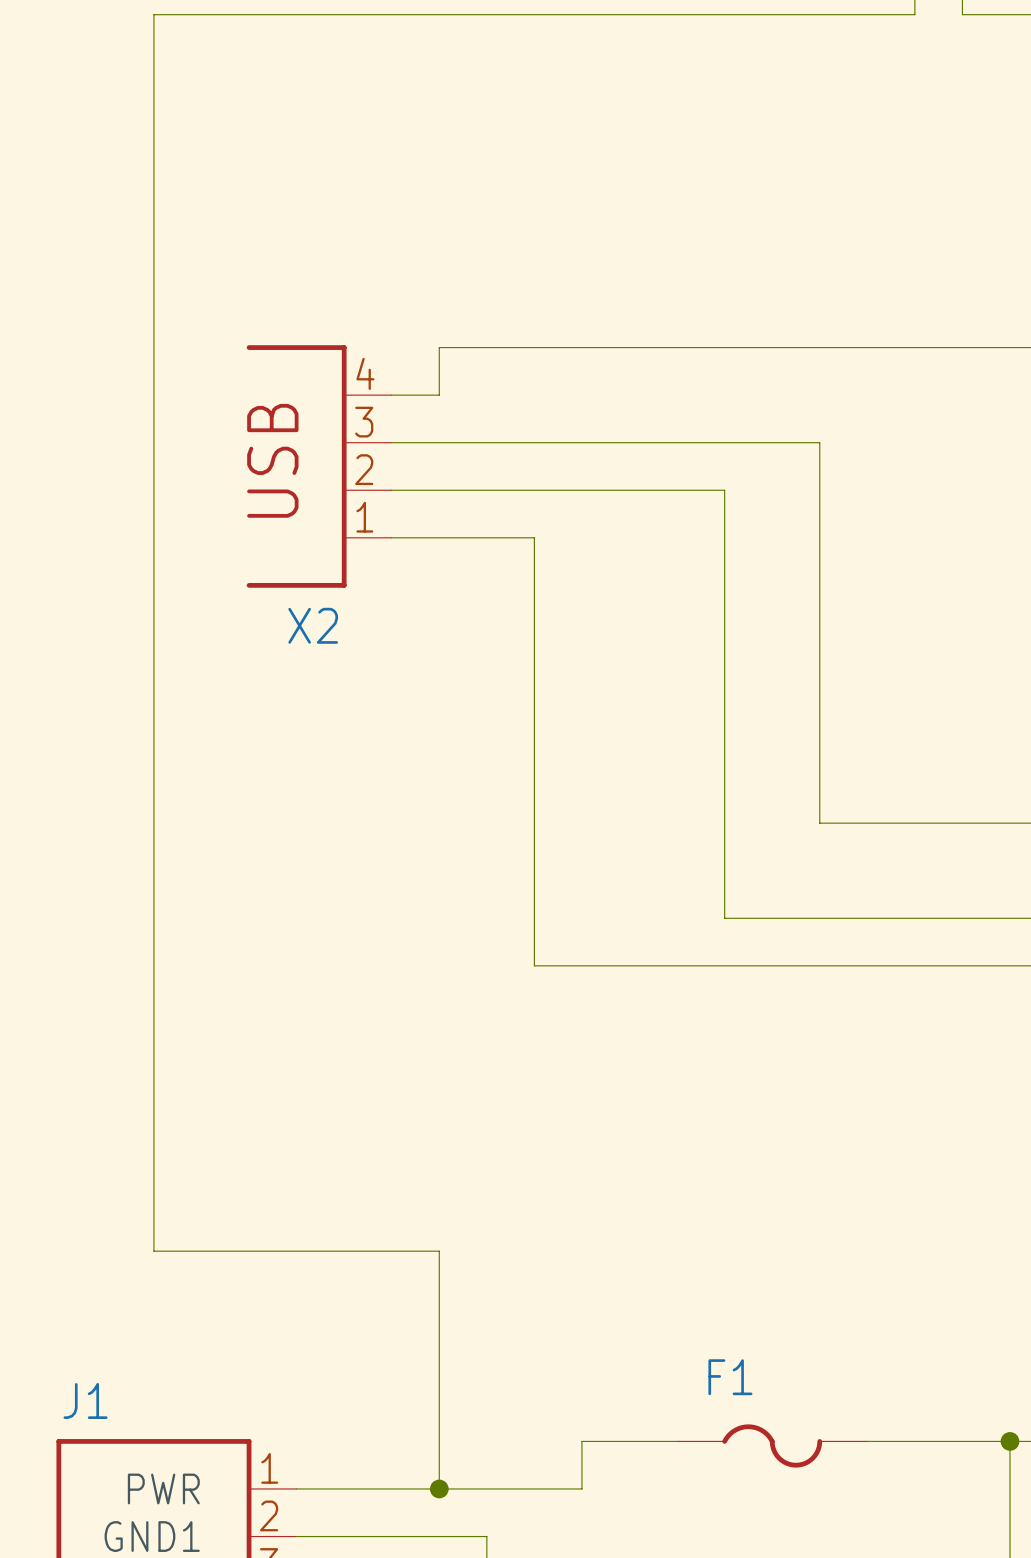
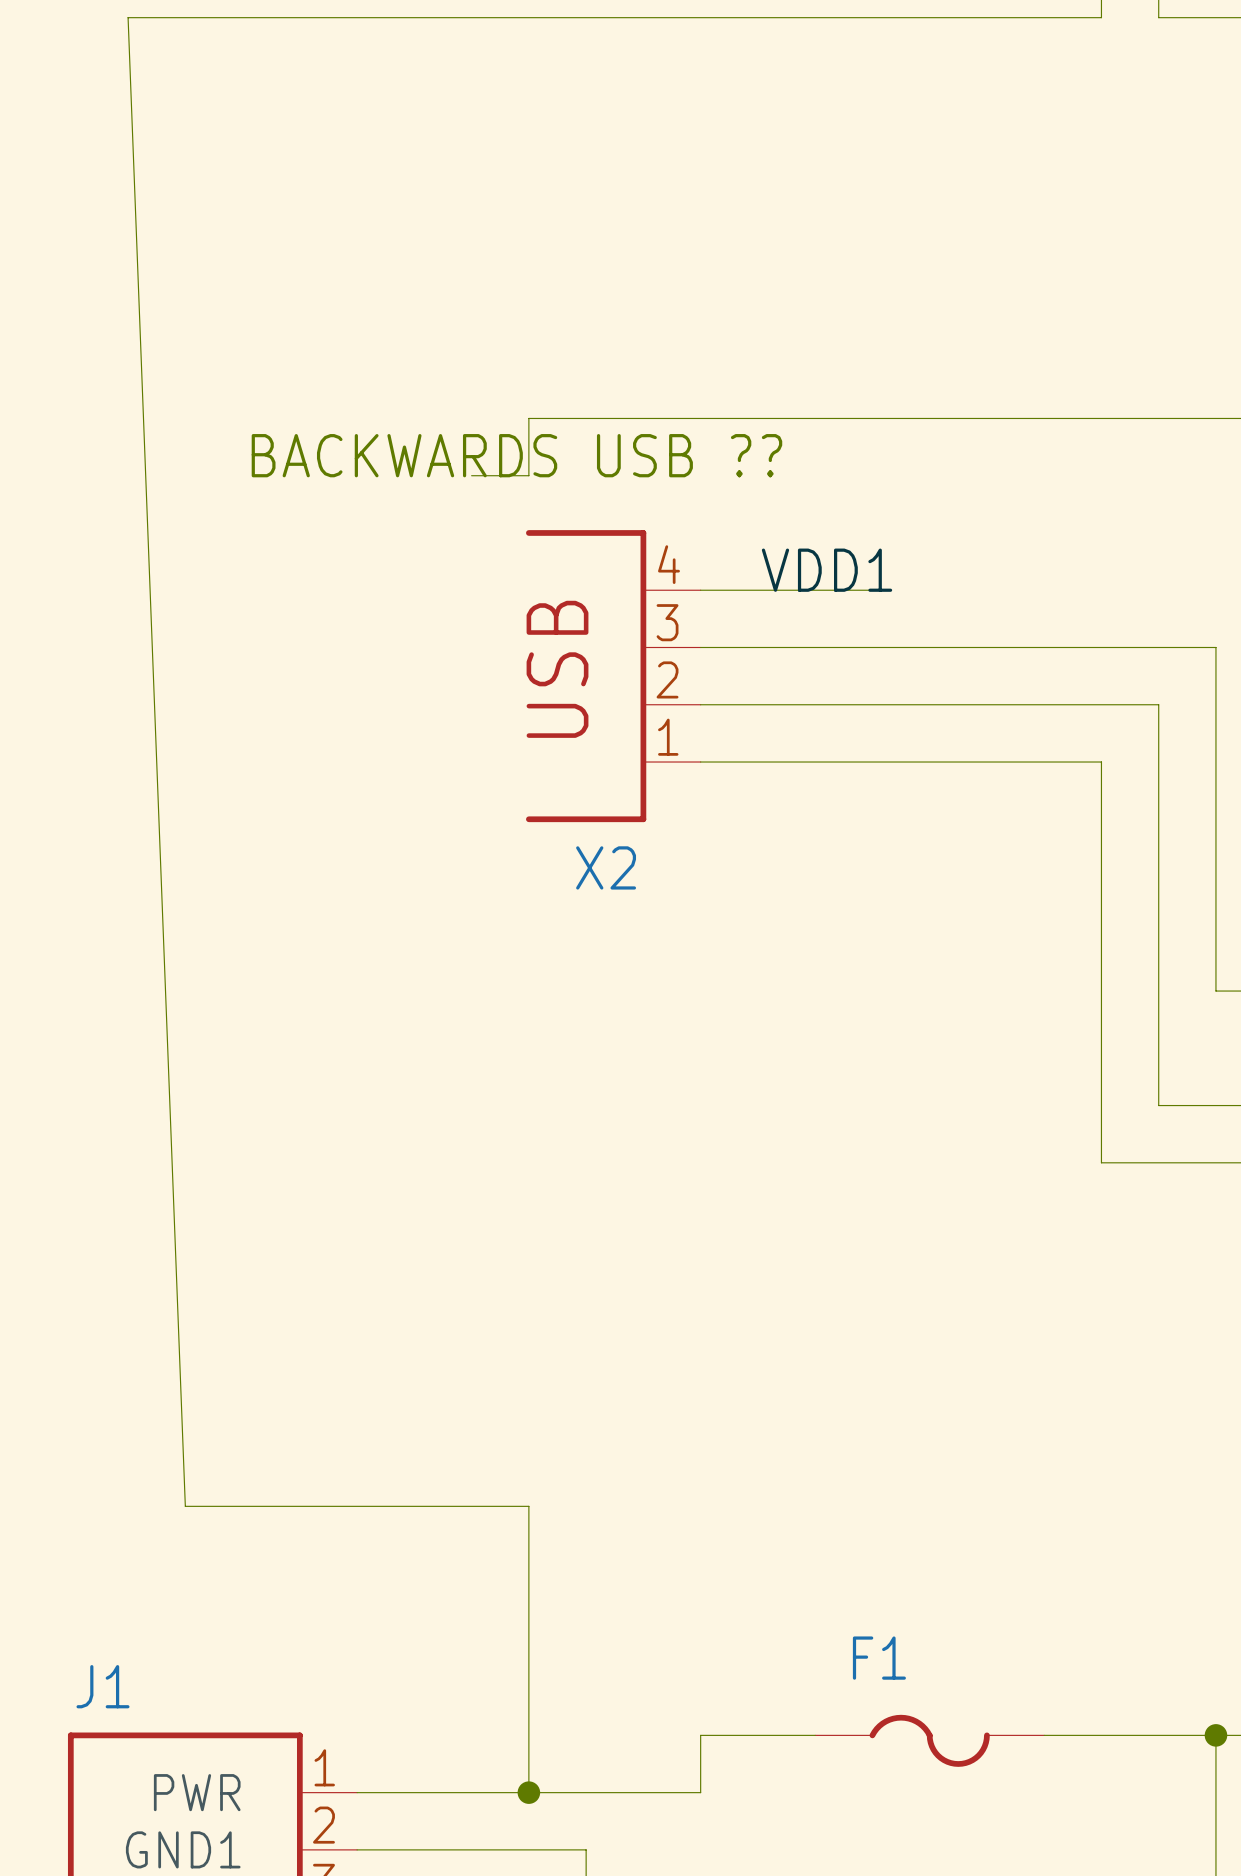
wire: (153, 14) (153, 1251) -> (185, 17) (128, 17) (185, 1506)
text: none -> BACKWARDS USB ?? (516, 455)
wire: (391, 442) (819, 442) (819, 823) (1009, 823) -> (700, 647) (1215, 647) (1215, 991)
X2 position: (319, 466) -> (613, 676)
label: none -> VDD1 (827, 570)
wire: (391, 490) (581, 490) -> none
wire: (724, 490) (724, 918) (962, 918) -> (700, 704) (1158, 704) (1158, 1105)
wire: (391, 537) (534, 537) (534, 965) (914, 965) -> (700, 762) (1101, 762) (1101, 1162)

